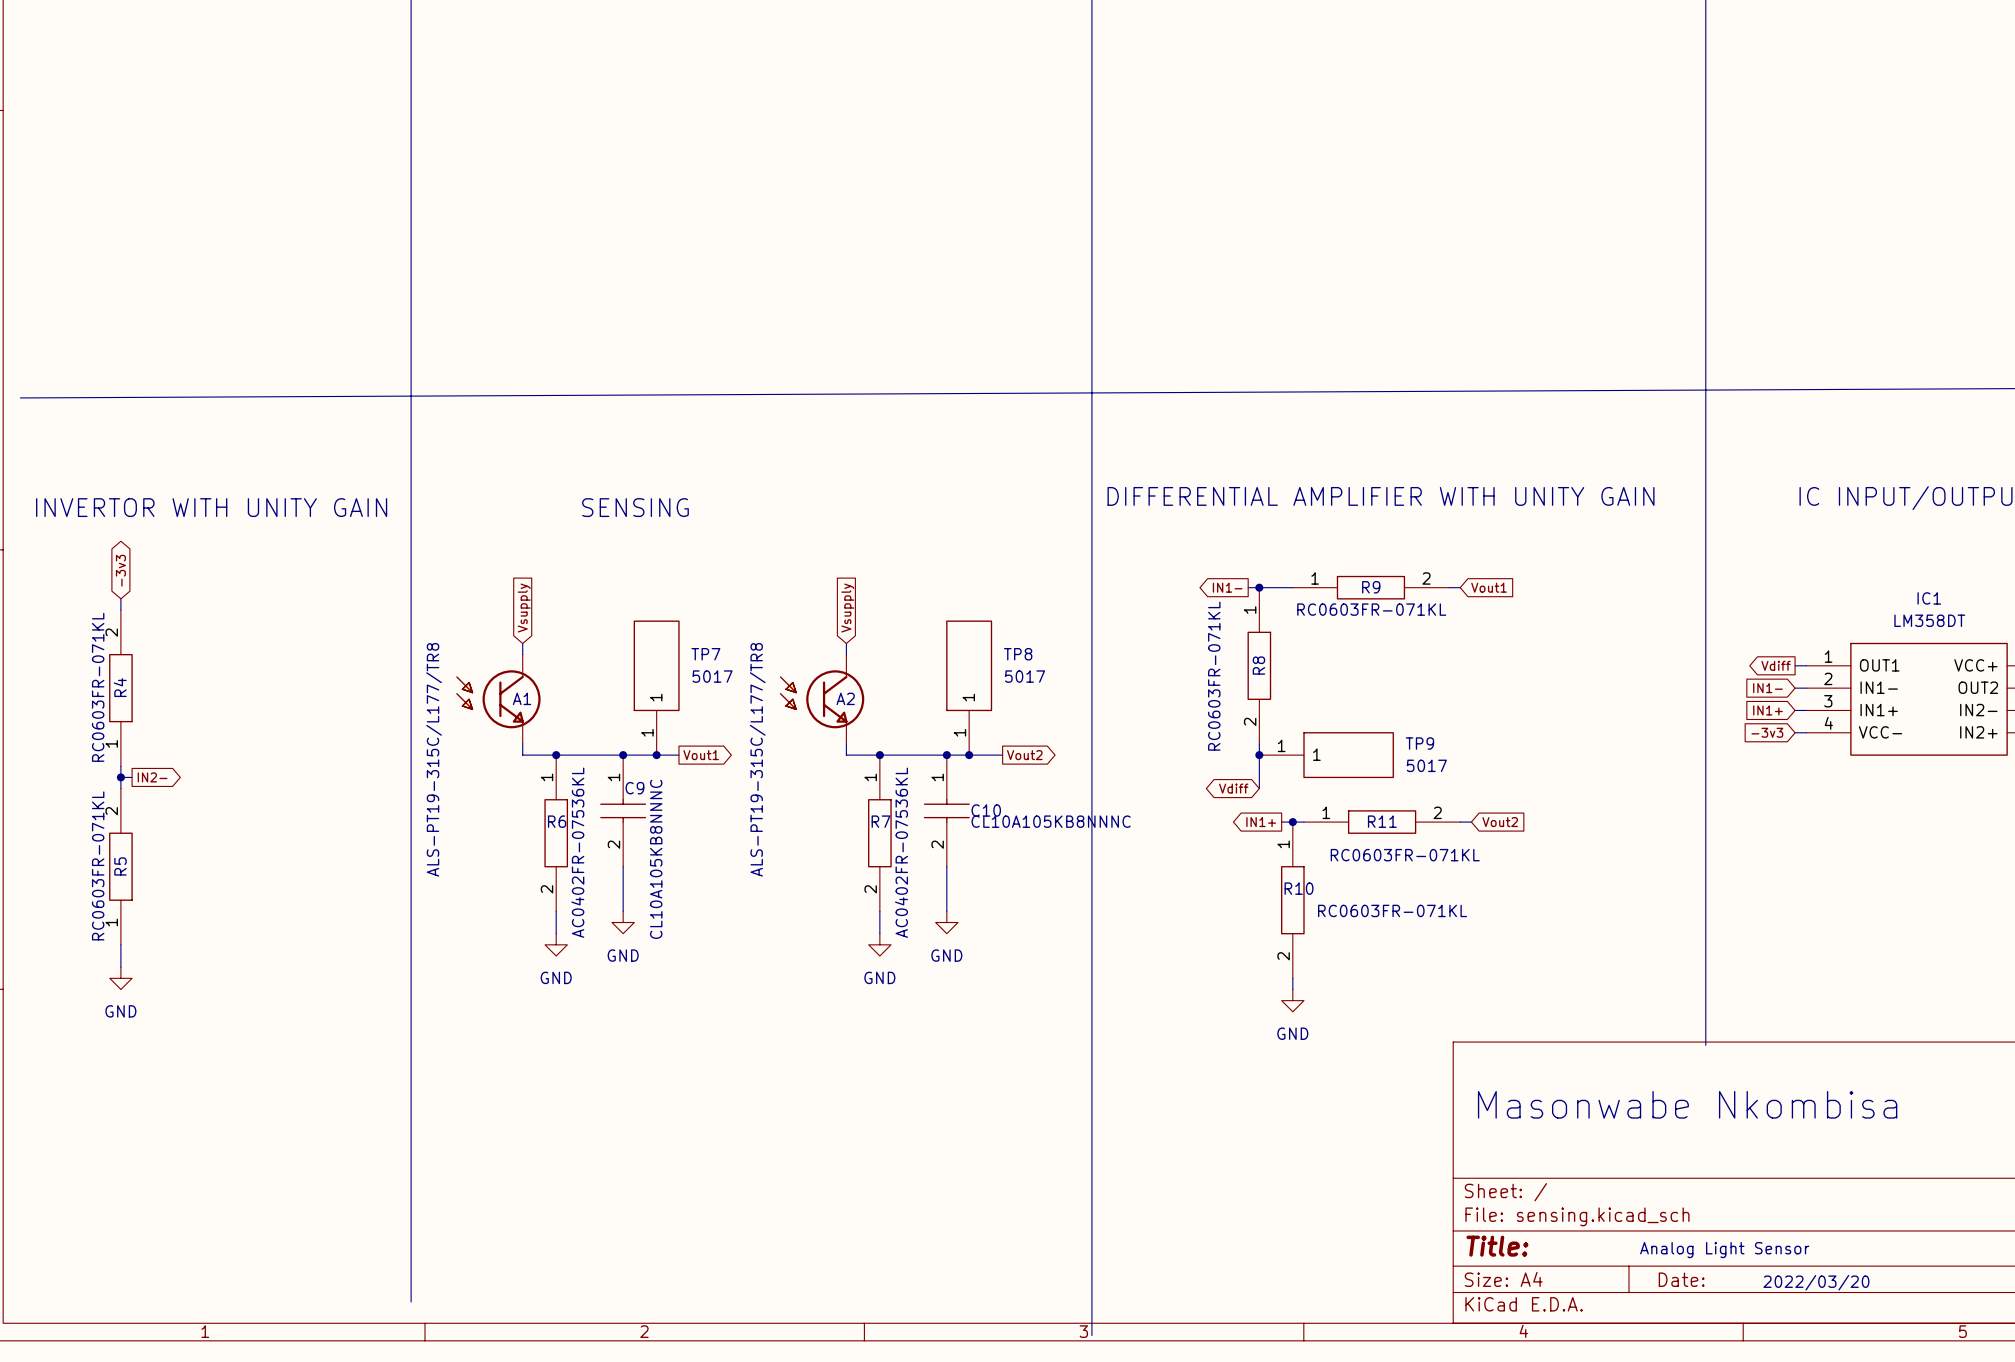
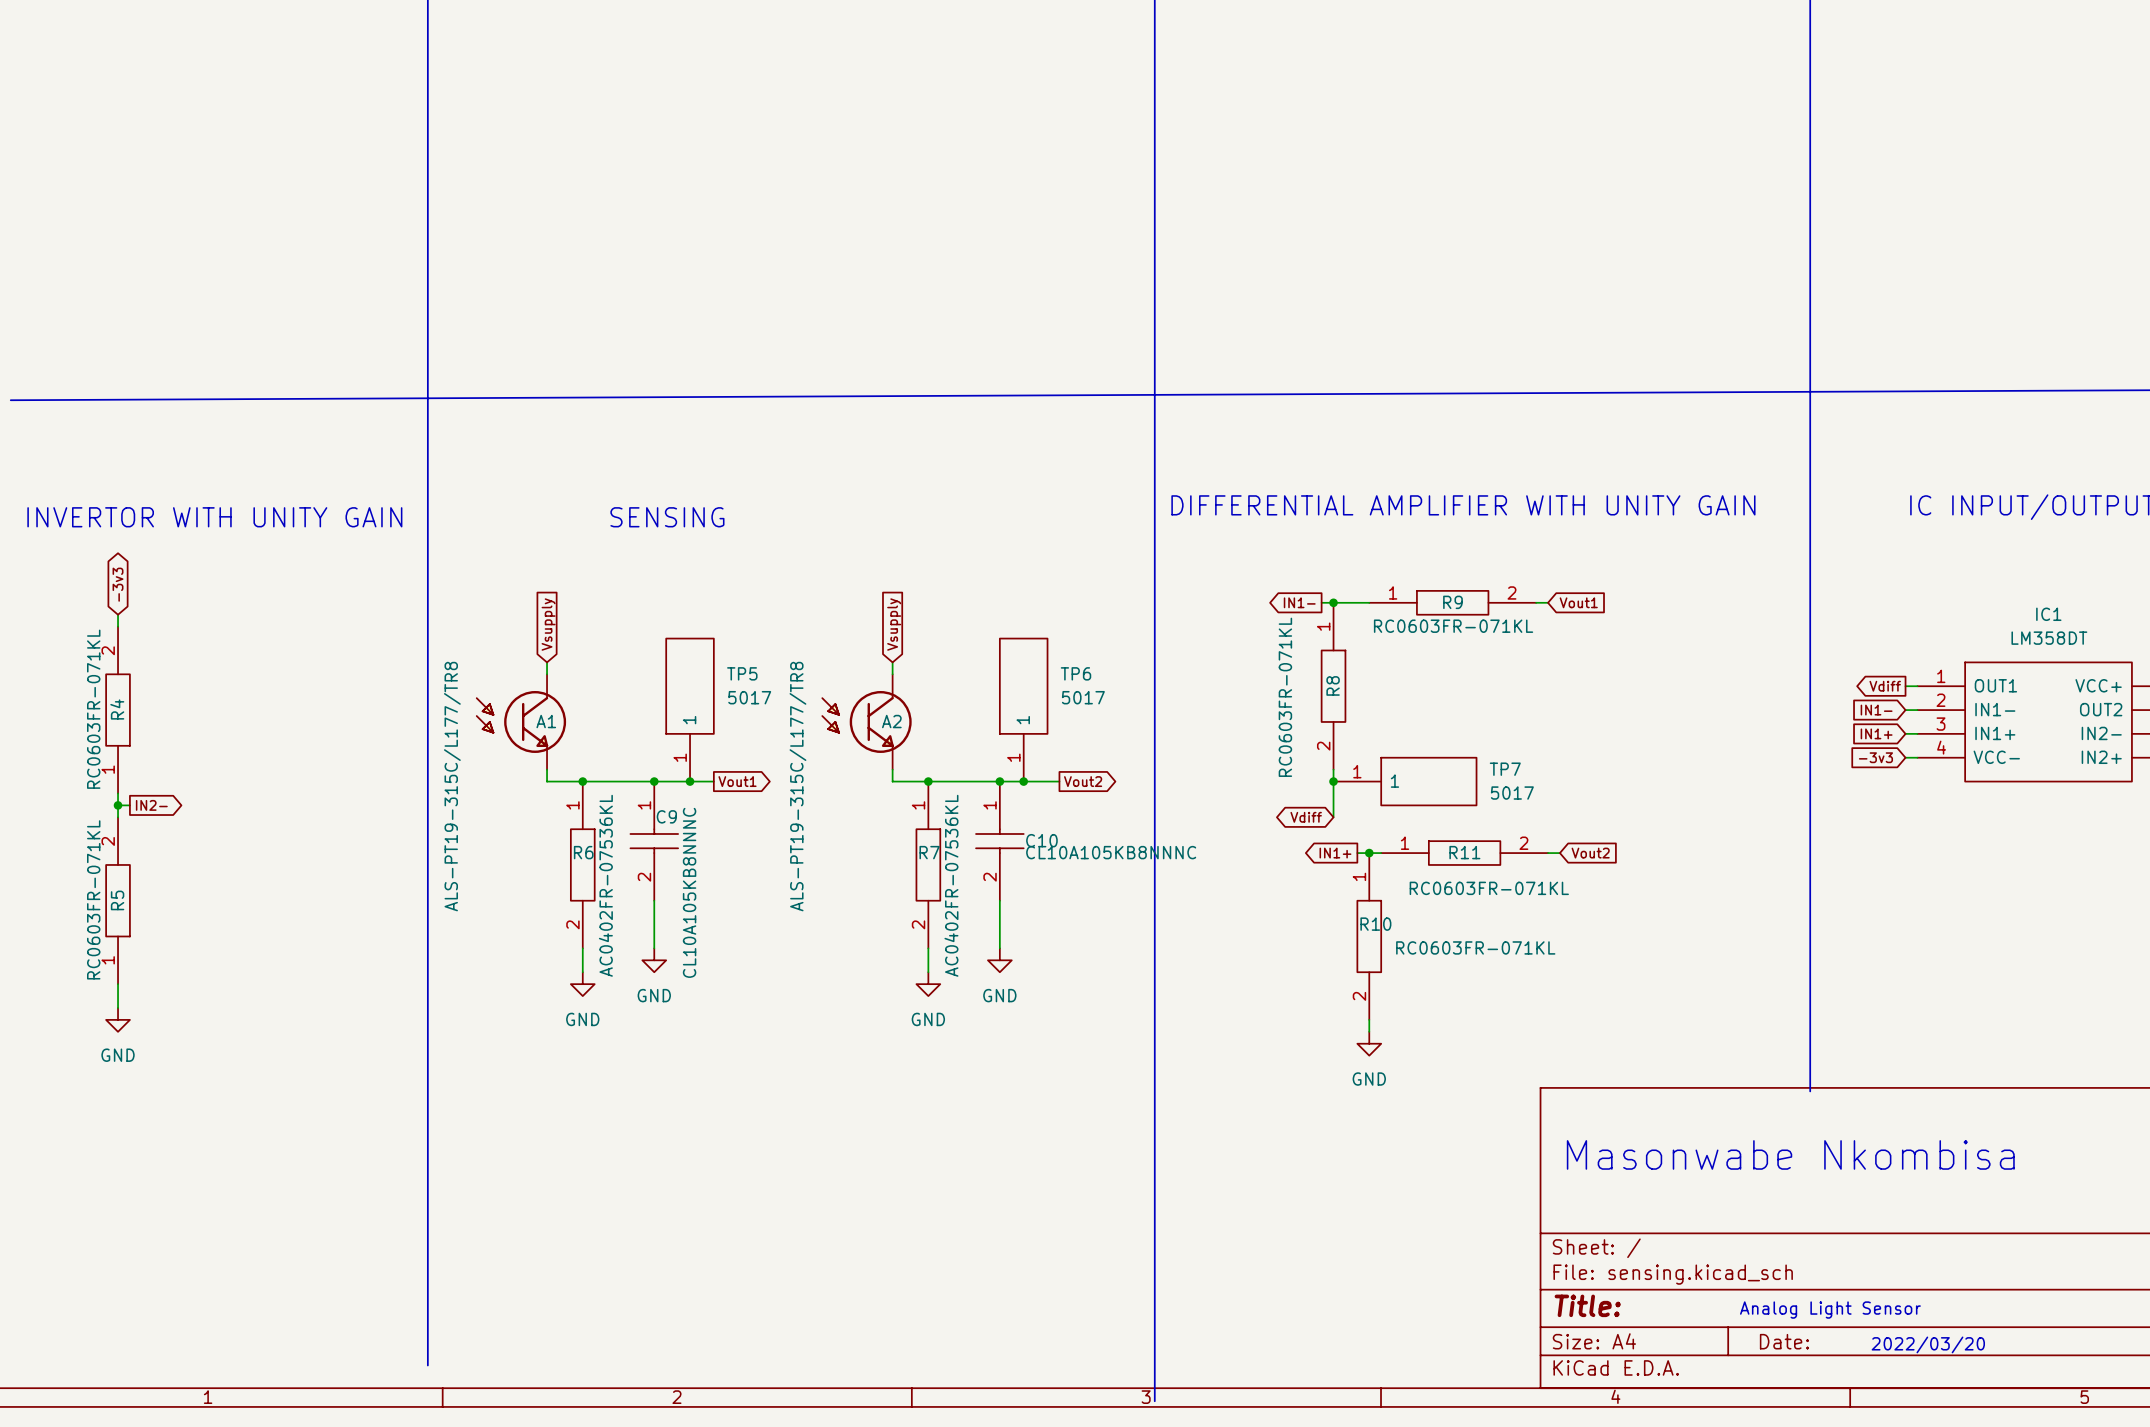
TP7 name: TP7 (705, 654) -> TP5 (742, 673)
TP8 name: TP8 (1018, 654) -> TP6 (1075, 673)
TP9 name: TP9 (1419, 743) -> TP7 (1505, 769)

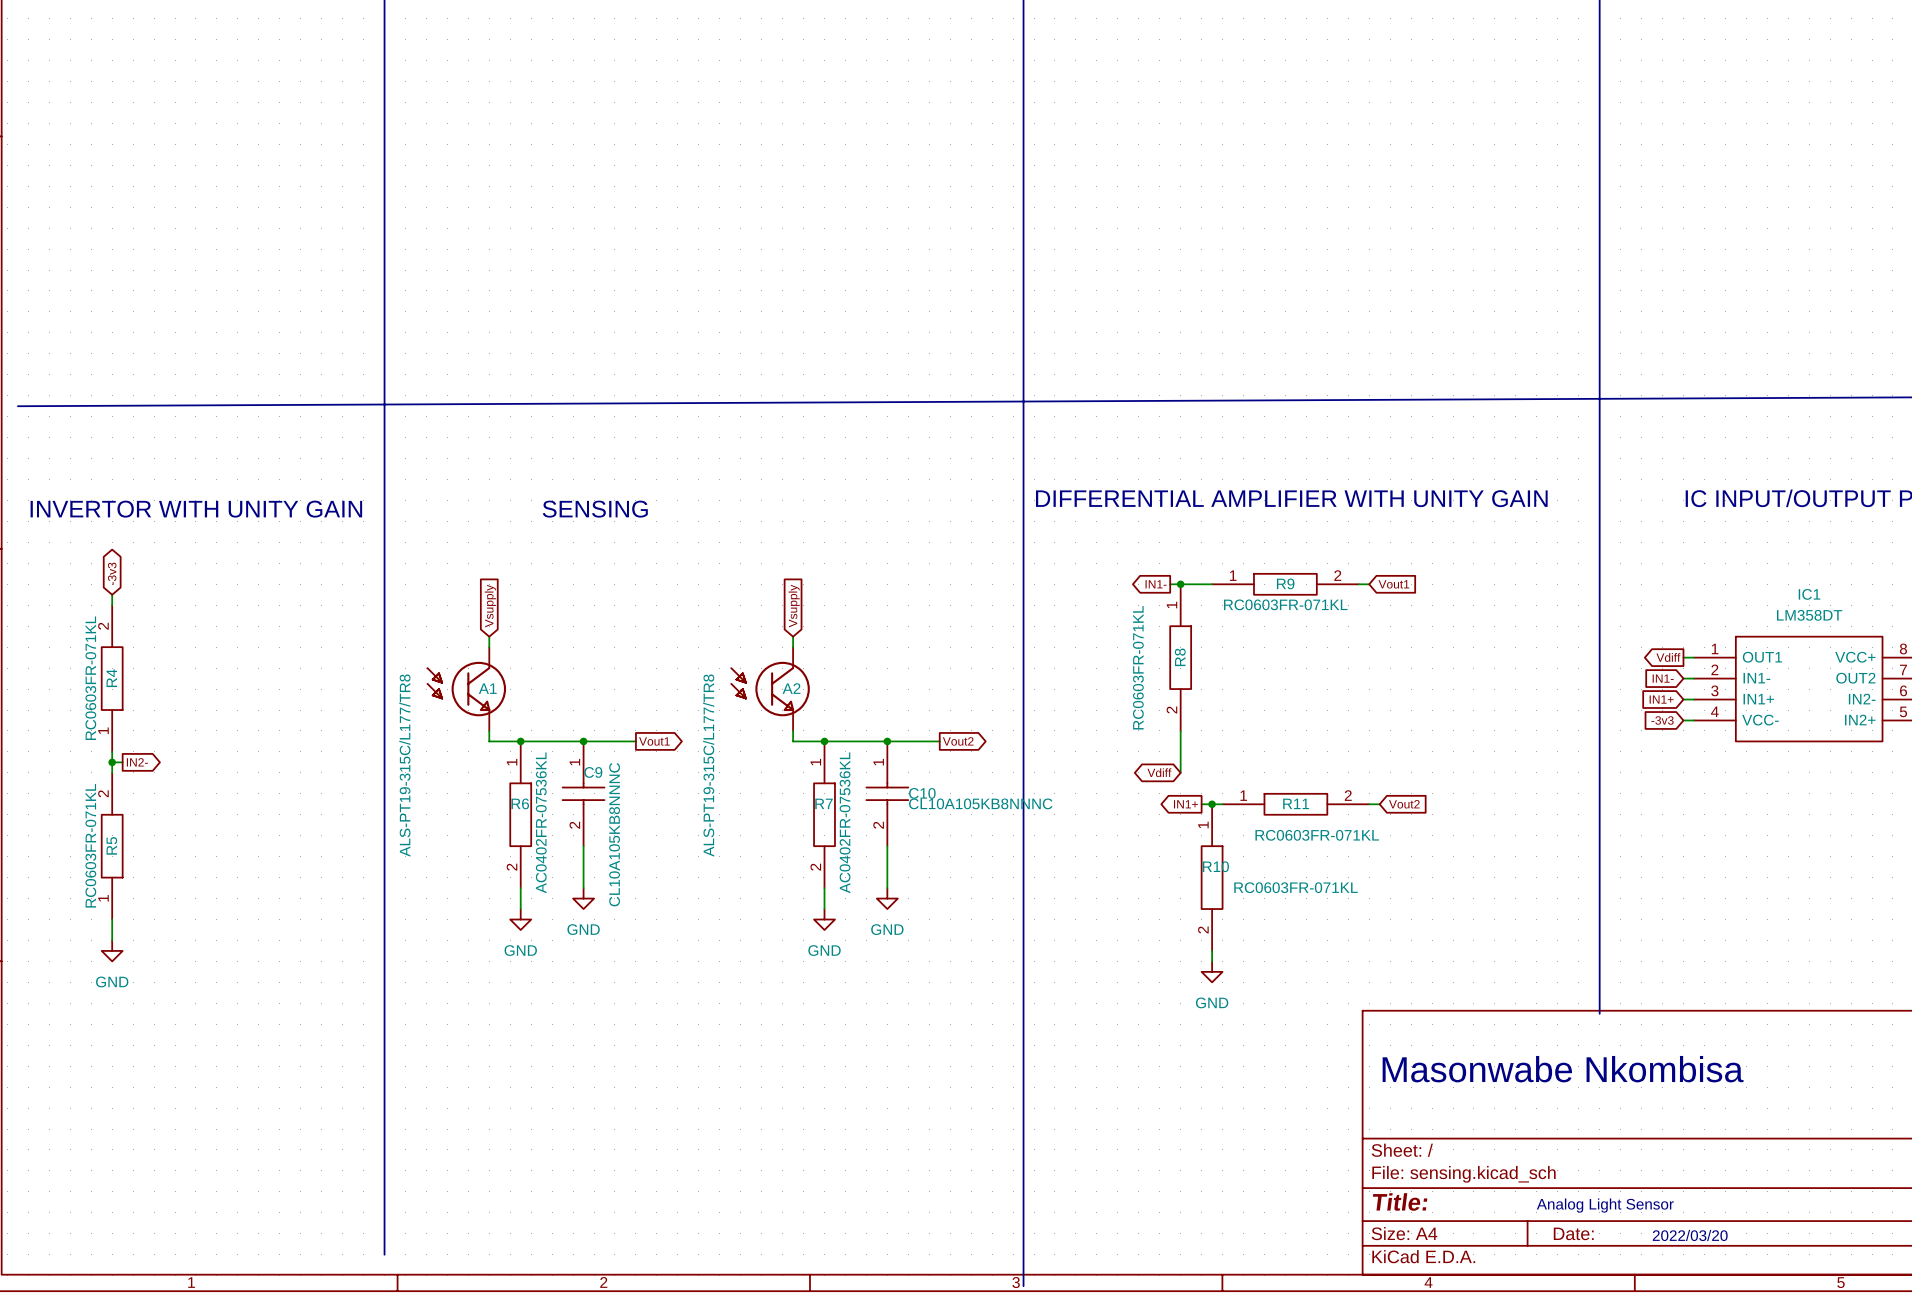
TP5: 5017 (690, 709) -> none
TP6: 5017 (1023, 709) -> none
junction: (690, 781) -> none
junction: (1023, 781) -> none
junction: (1333, 781) -> none
TP7: 5017 (1405, 781) -> none

